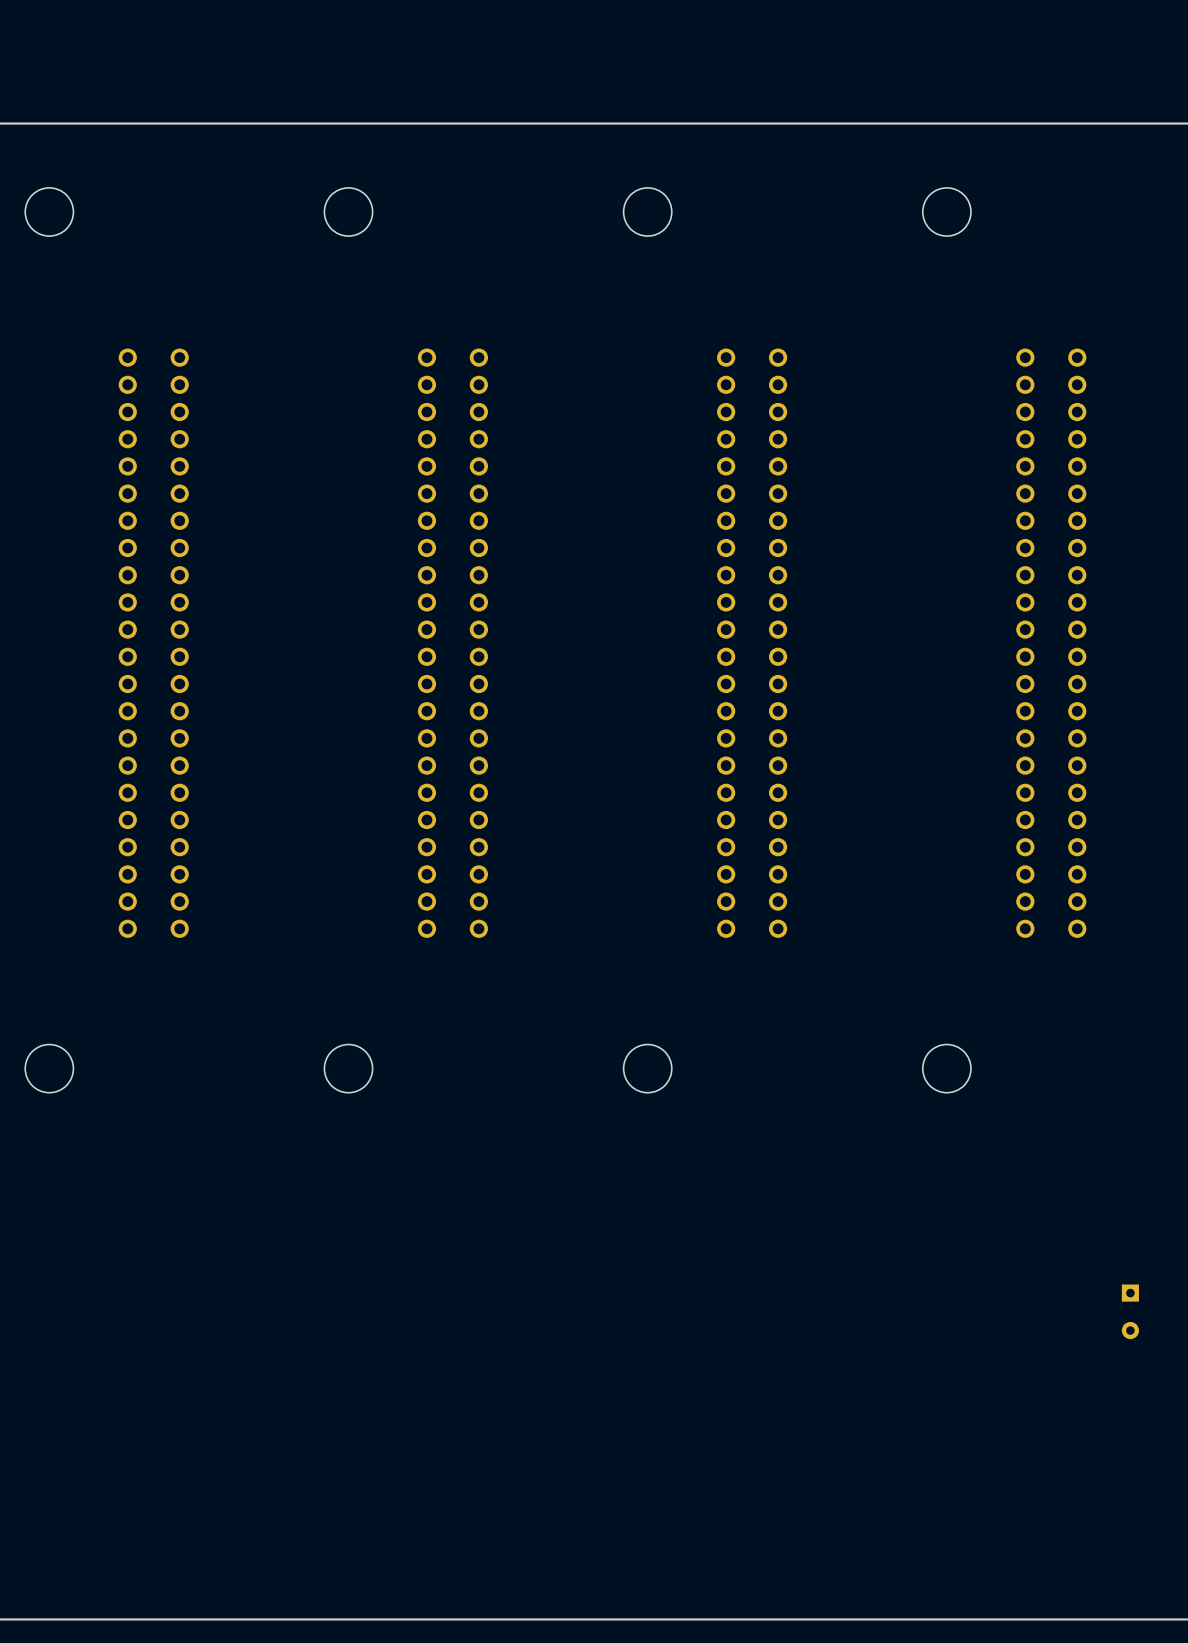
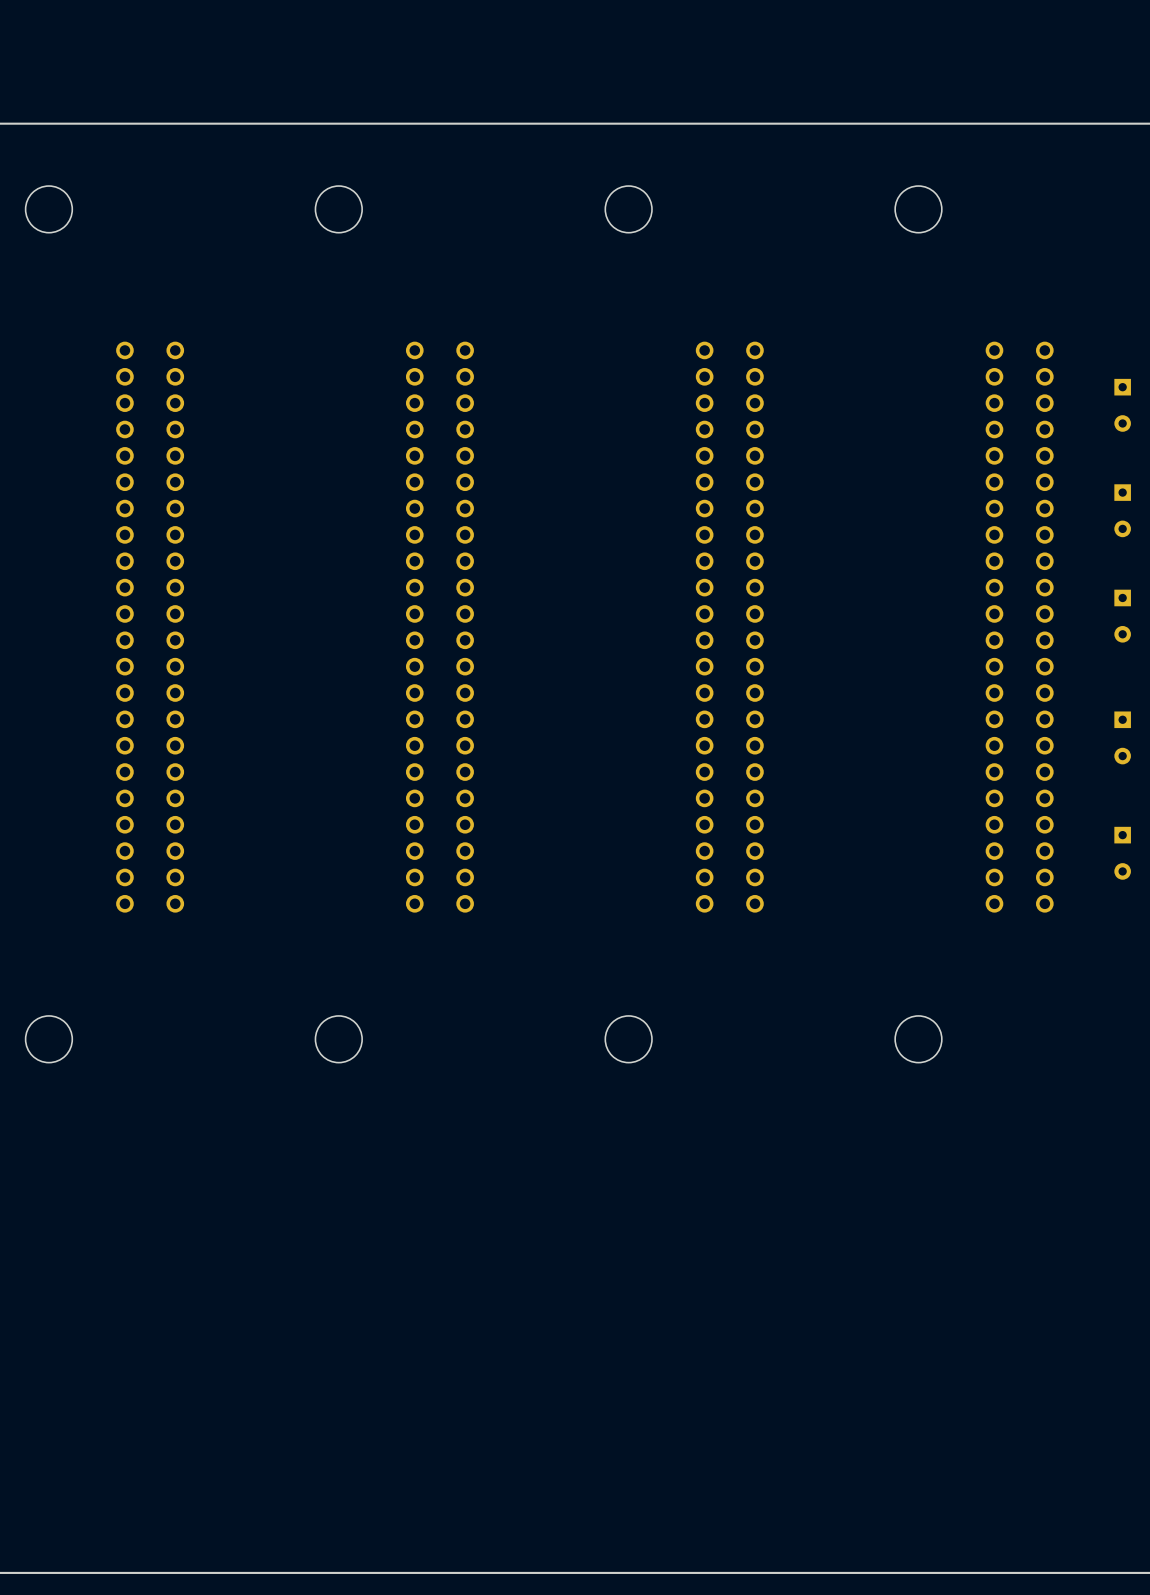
part: none -> (1122, 405)
part: none -> (1122, 510)
part: none -> (1122, 616)
part: none -> (1122, 737)
part: none -> (1122, 853)
part: (1130, 1311) -> none

